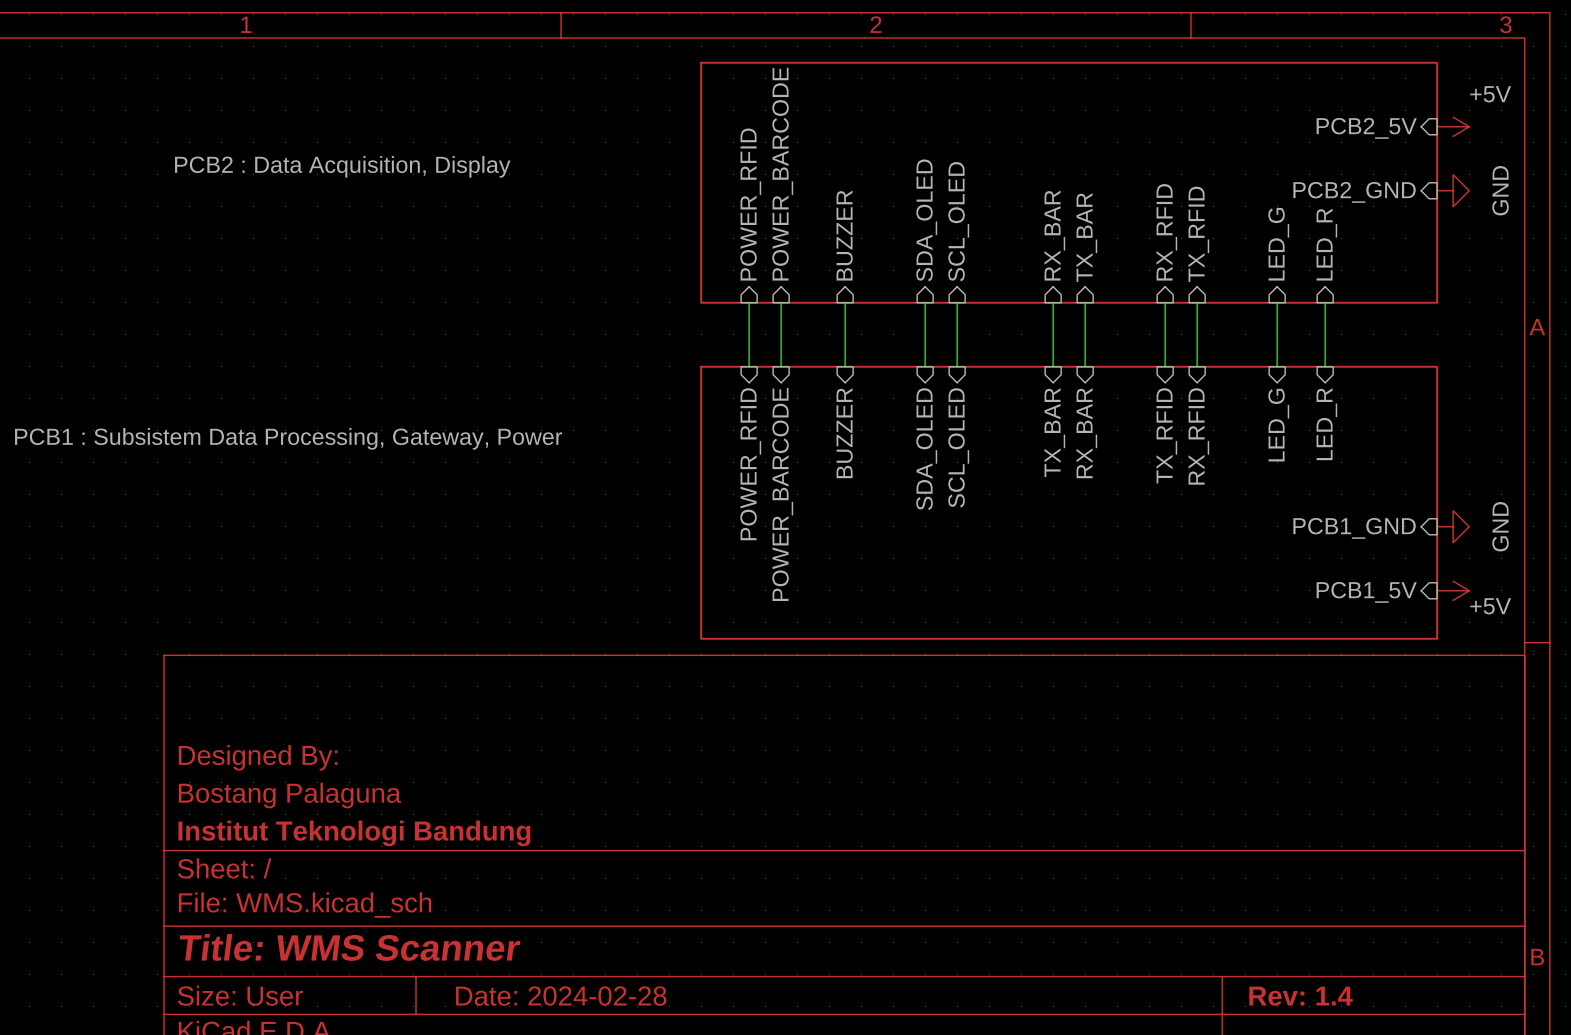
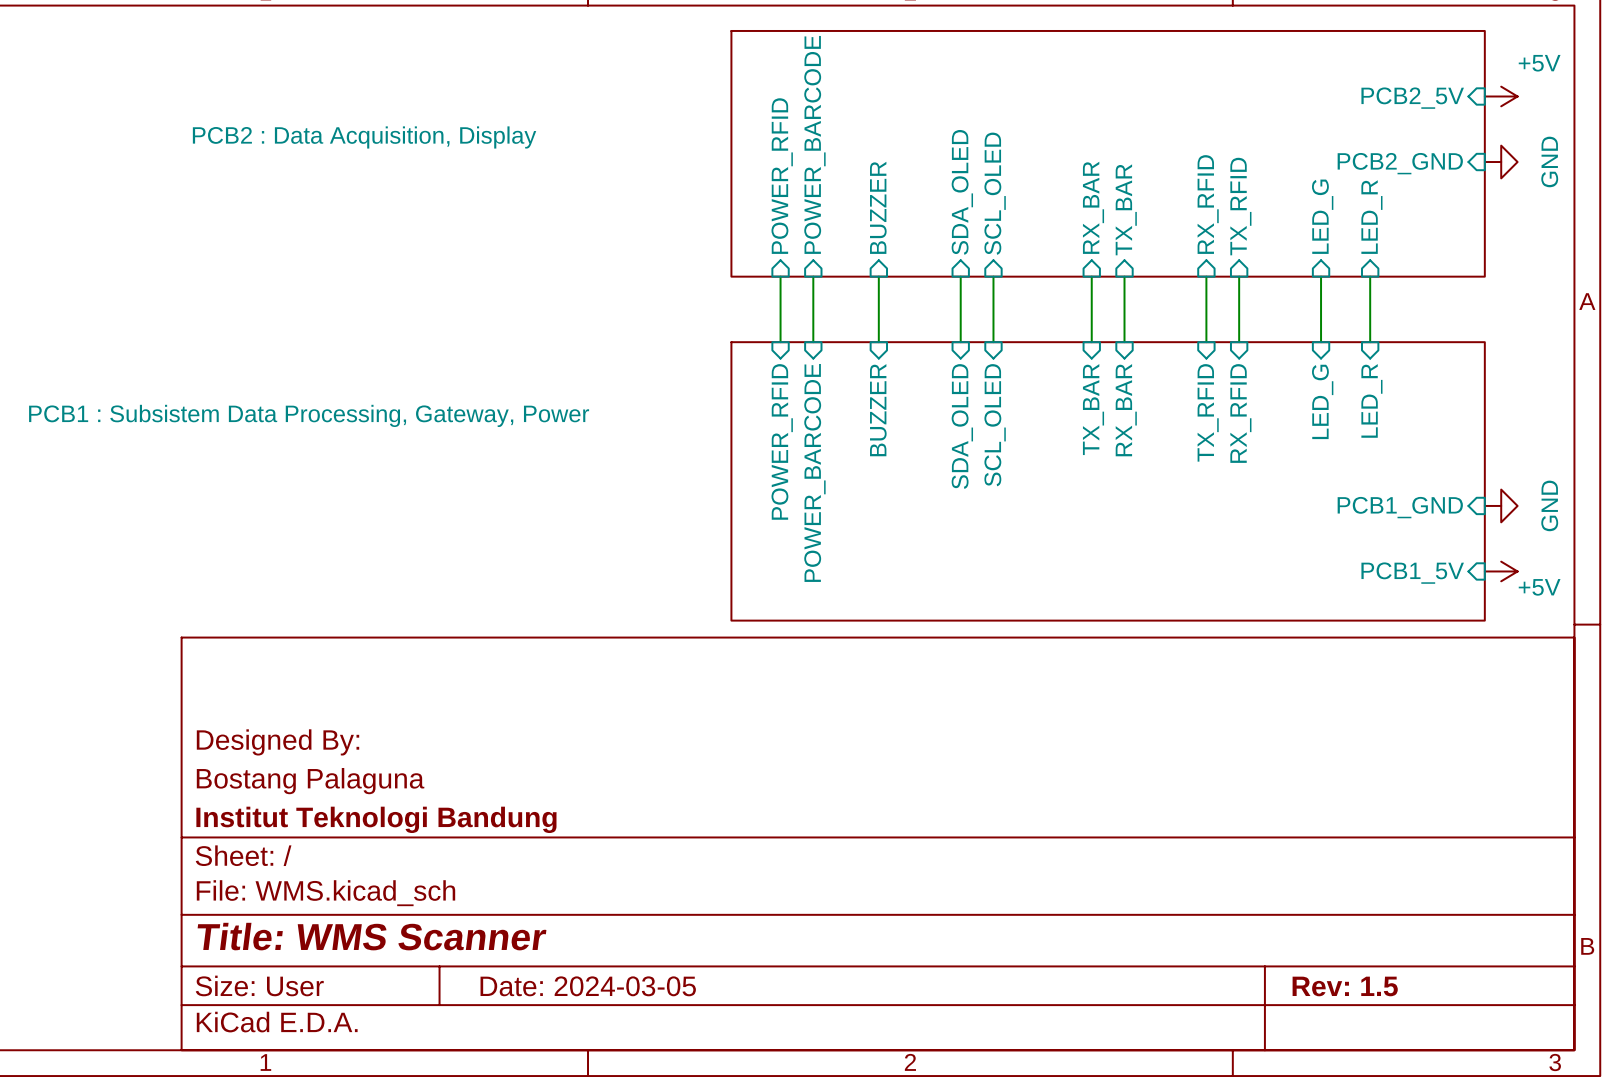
title block: Date: 2024-02-28 (561, 996) -> Date: 2024-03-05 (588, 986)
title block: Rev: 1.4 (1301, 996) -> Rev: 1.5 (1345, 986)

